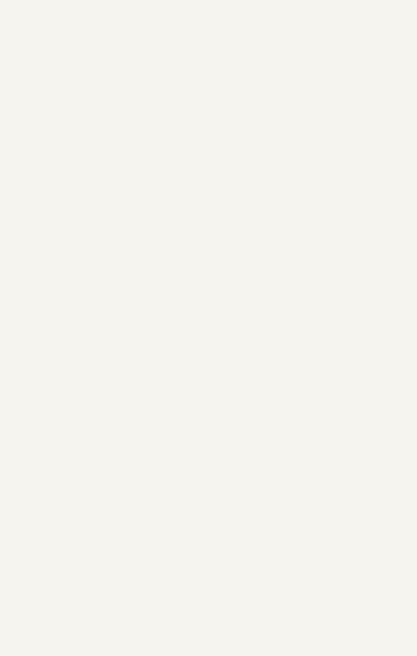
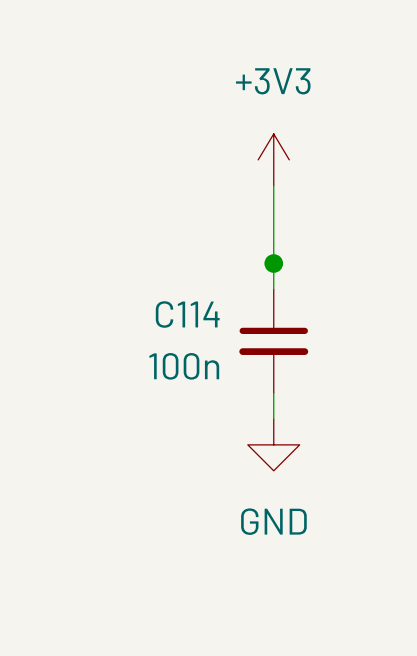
power symbol: none -> +3V3 (273, 159)
wire: none -> (273, 185) (273, 289)
junction: none -> (273, 263)
C114: none -> 100n (273, 341)
wire: none -> (273, 393) (273, 418)
power symbol: none -> GND (273, 444)

